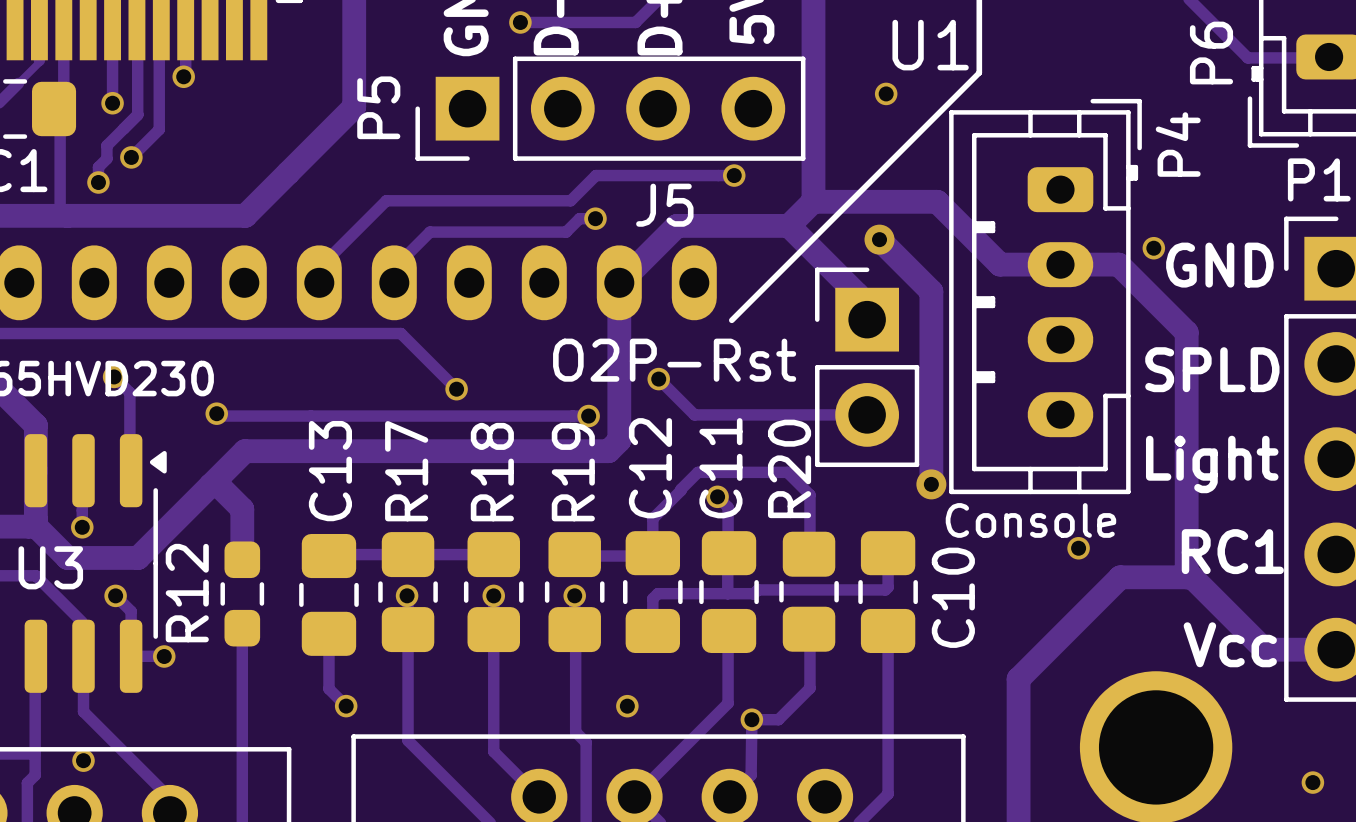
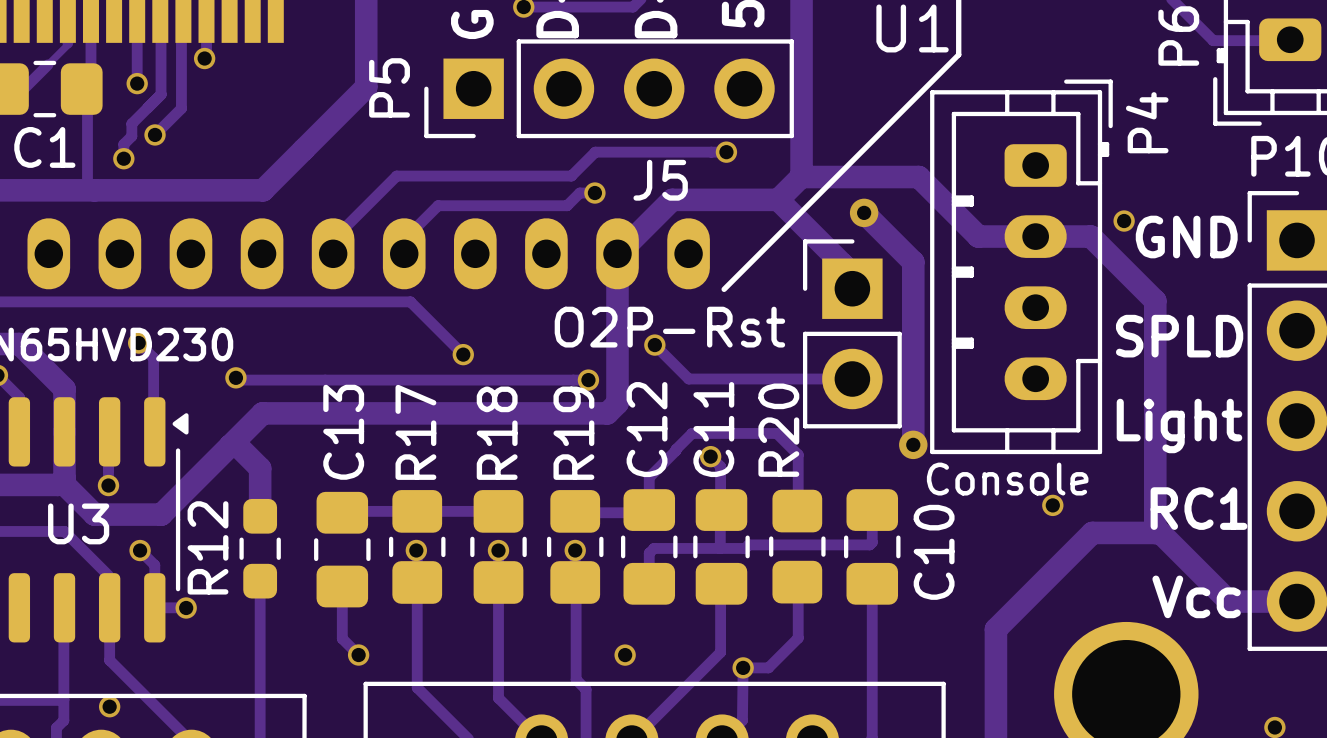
via: (886, 93) -> none

